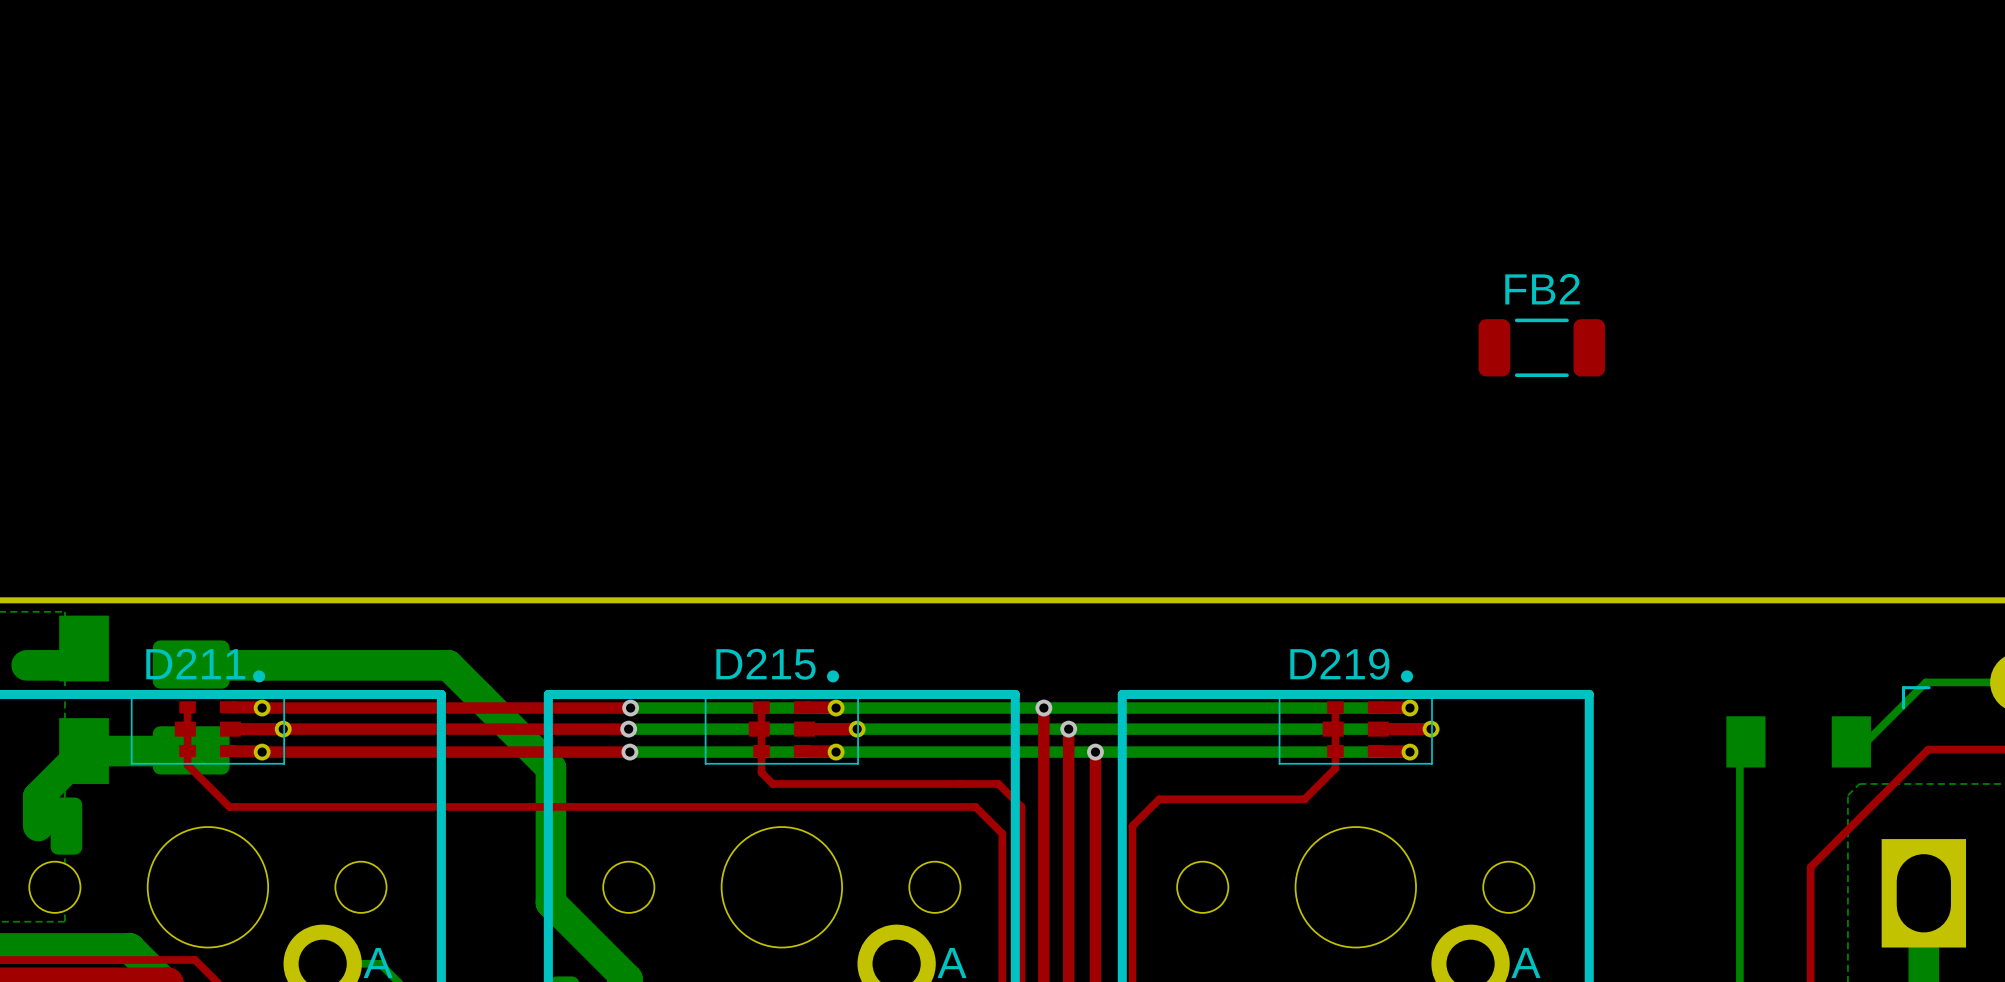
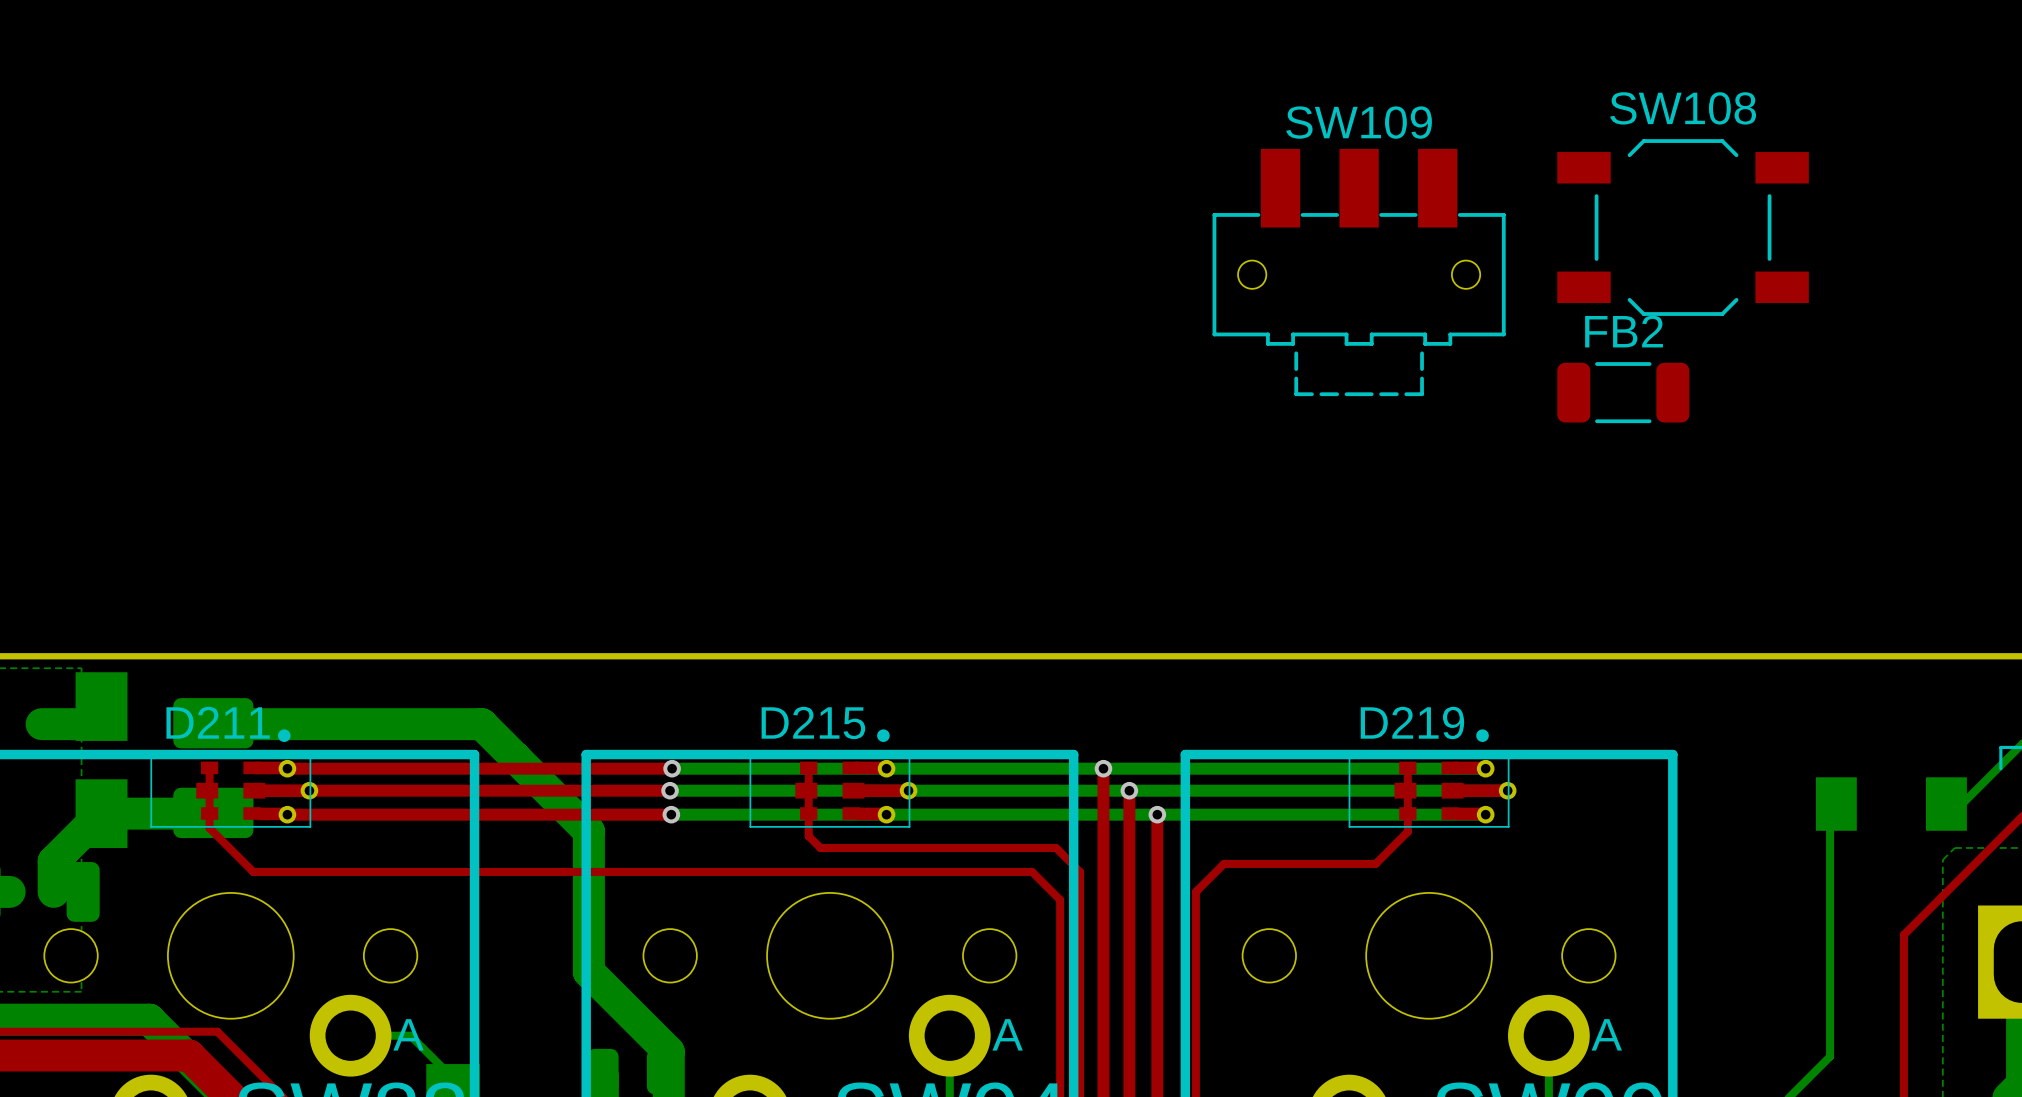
SW108: none -> (1683, 227)
SW109: none -> (1359, 272)

